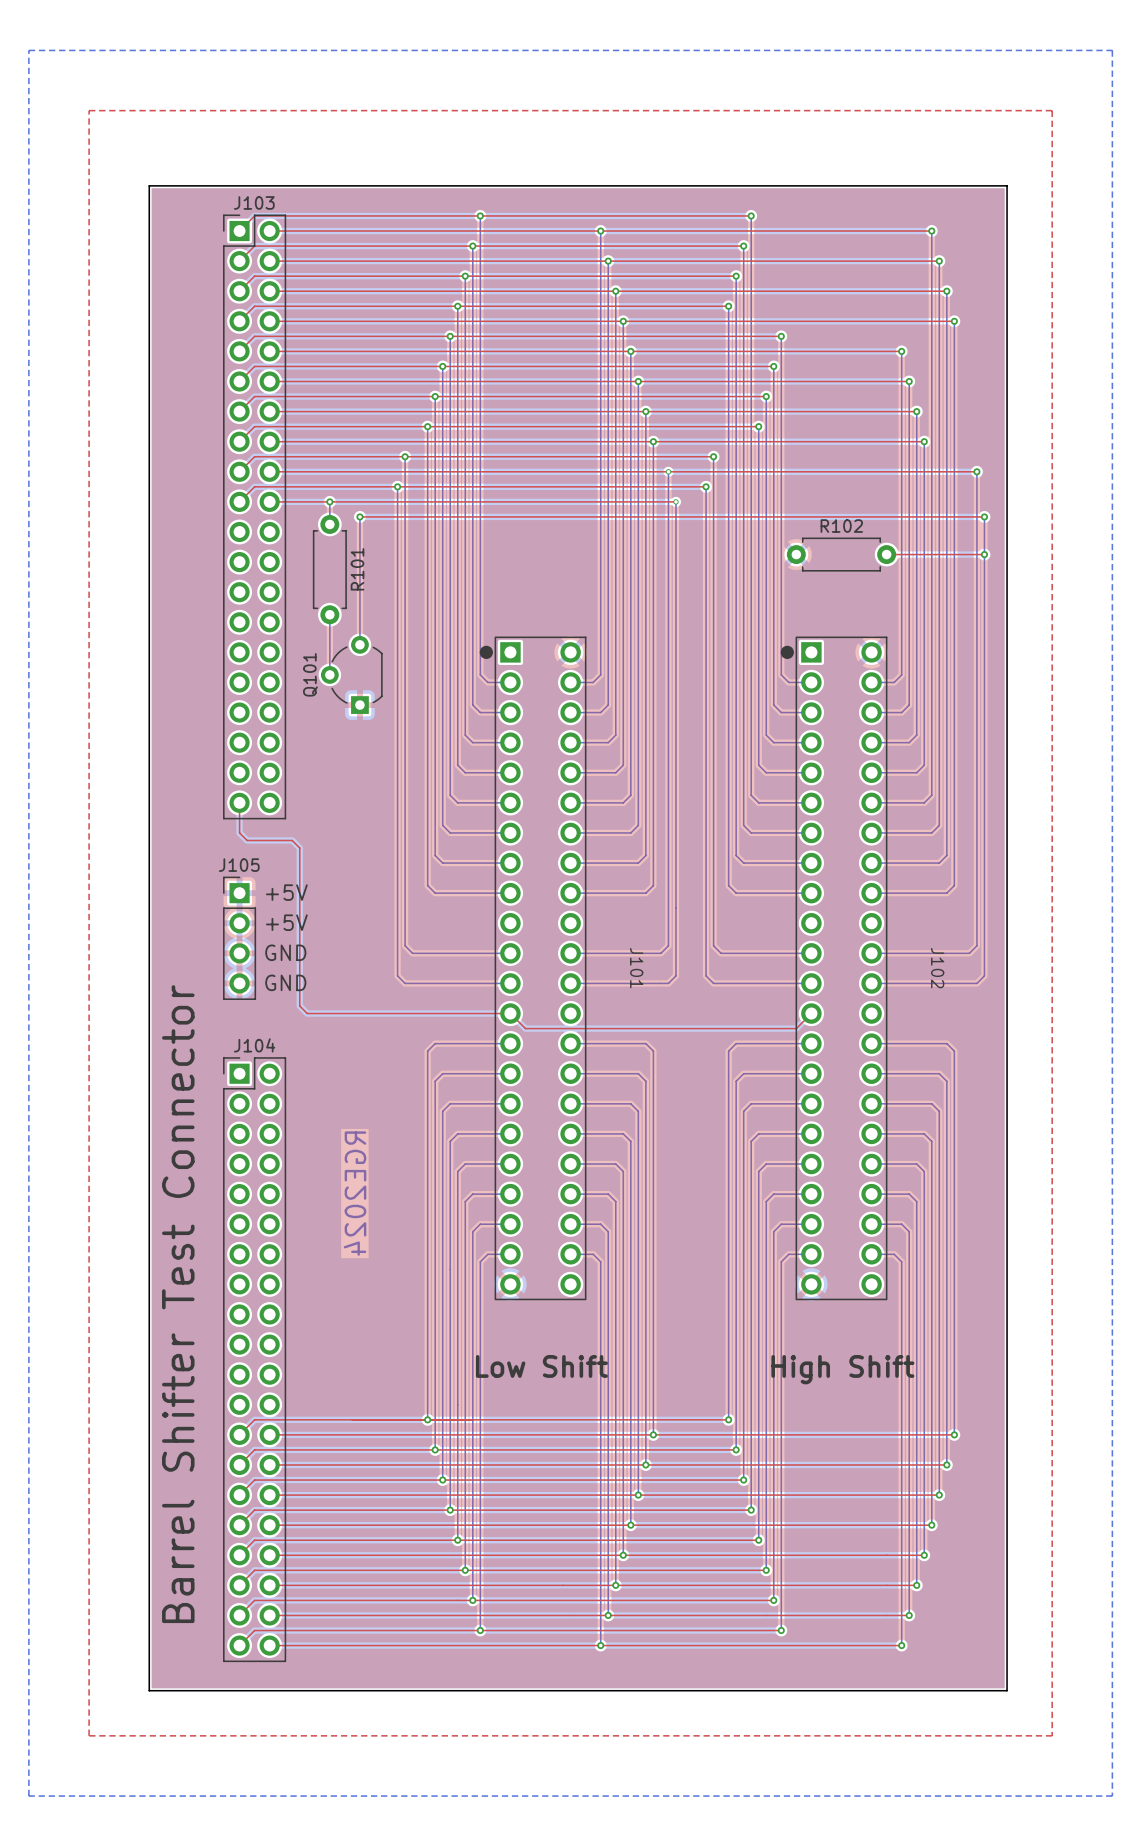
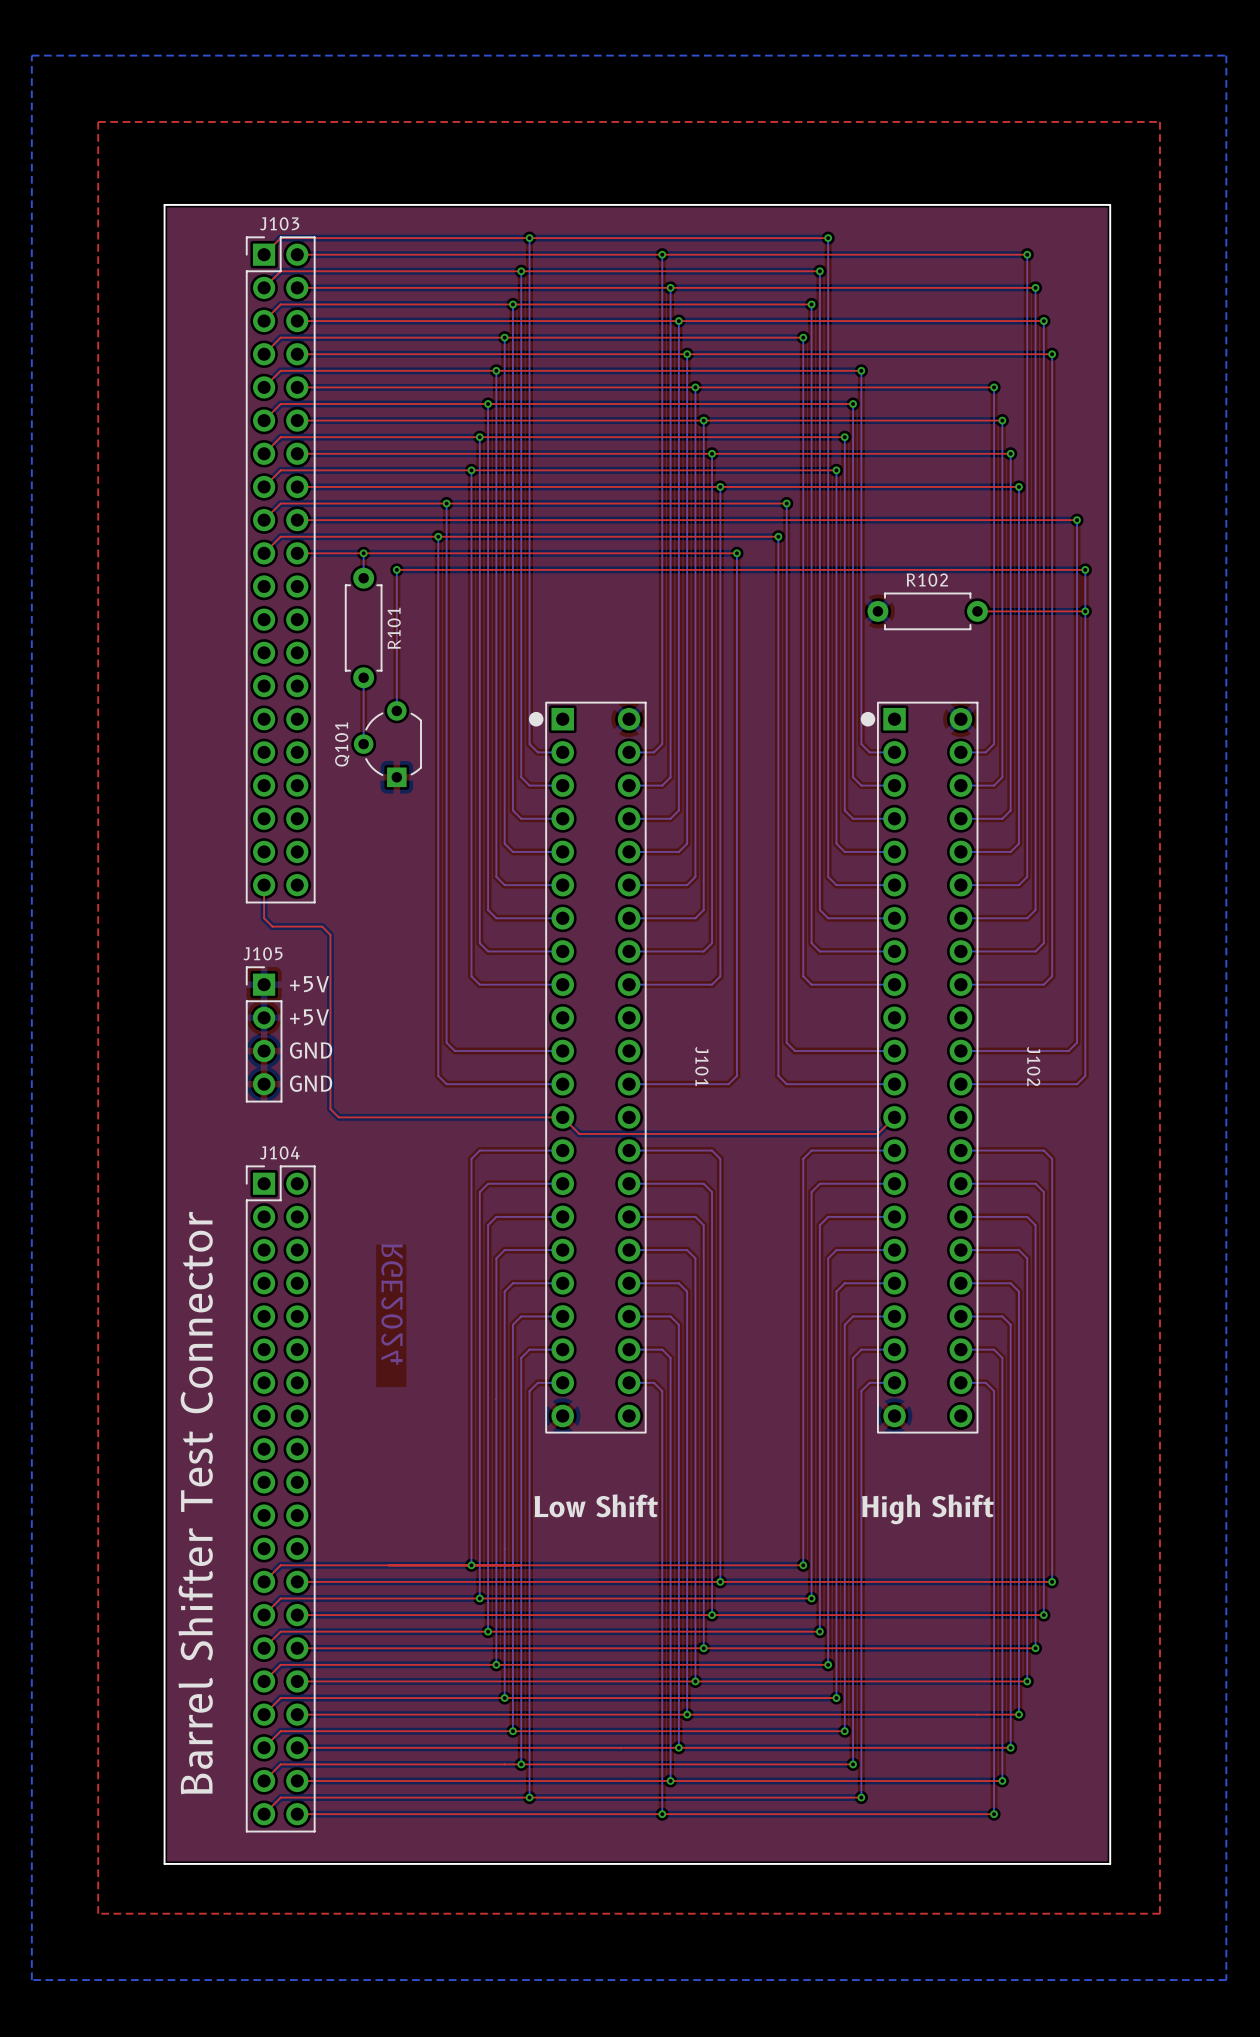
bottom track: (668, 471) (668, 501) -> none
via: (668, 471) -> none
top track: (668, 501) (675, 501) -> none
via: none -> (736, 553)
bottom track: (675, 501) (675, 975) (668, 983) (660, 983) -> none
via: (675, 501) -> none
bottom track: (668, 945) (660, 953) (570, 953) -> (736, 1042) (736, 1075) (728, 1084)

